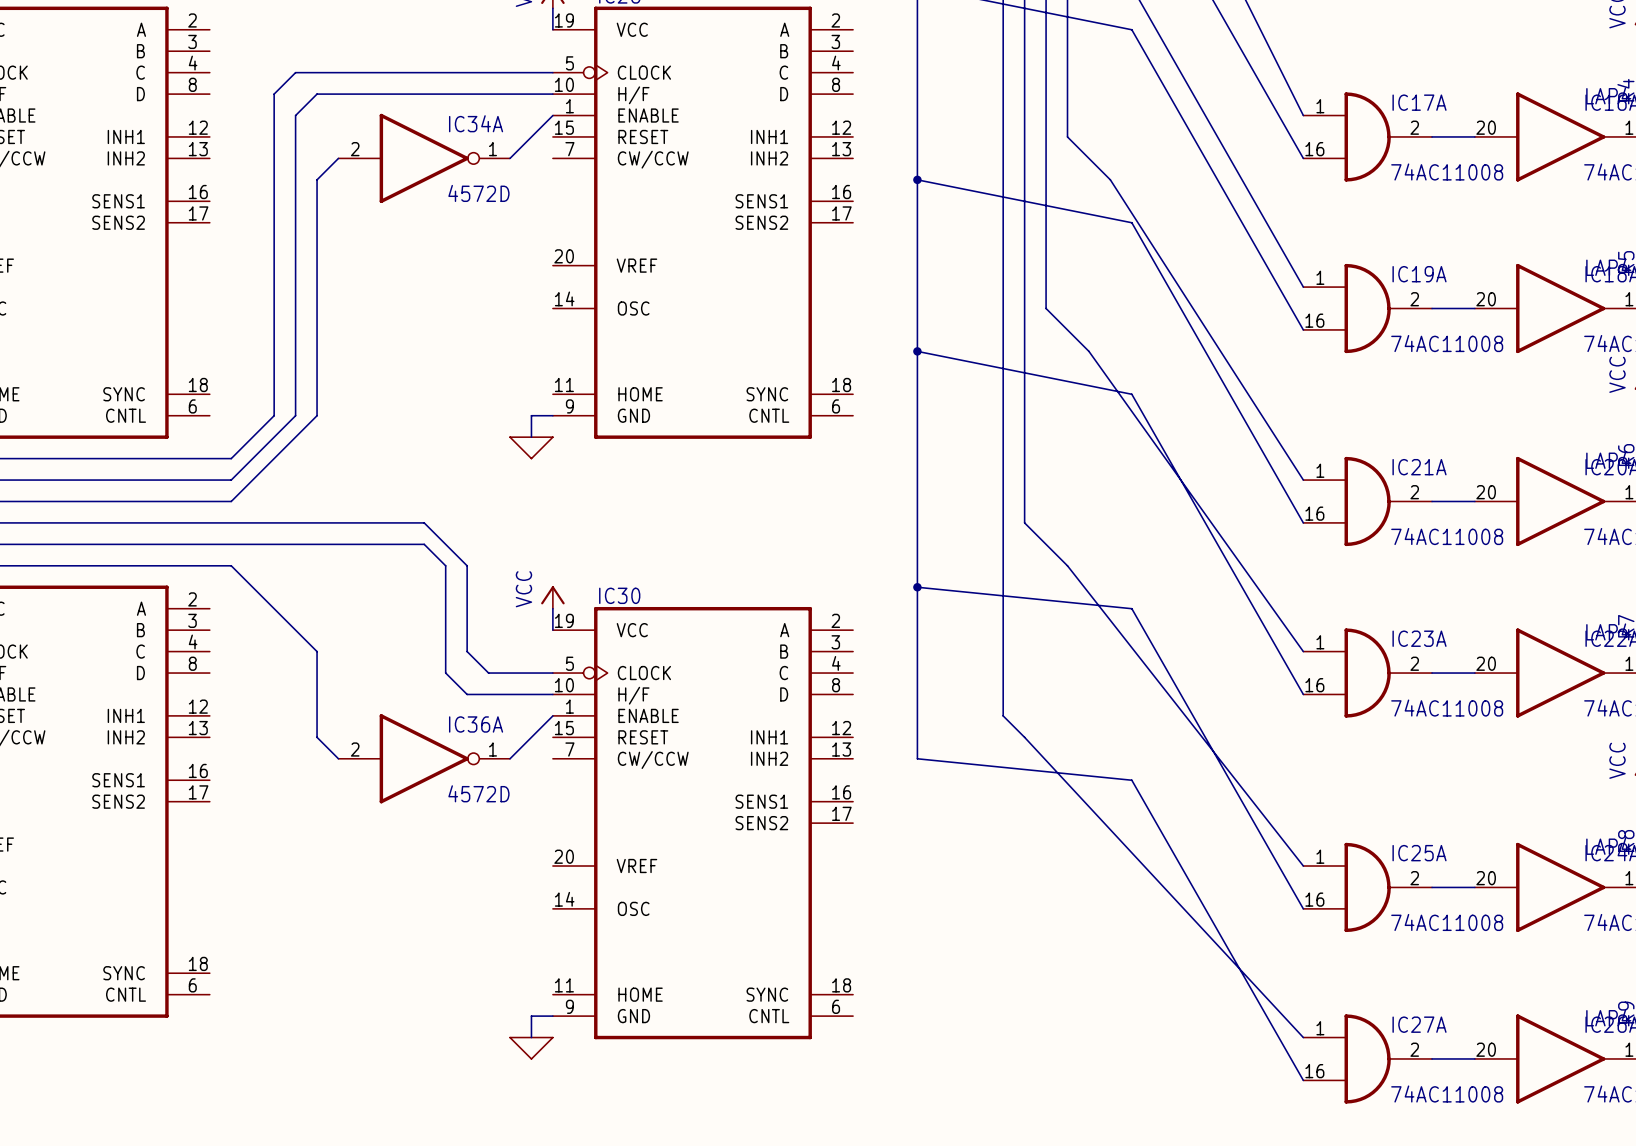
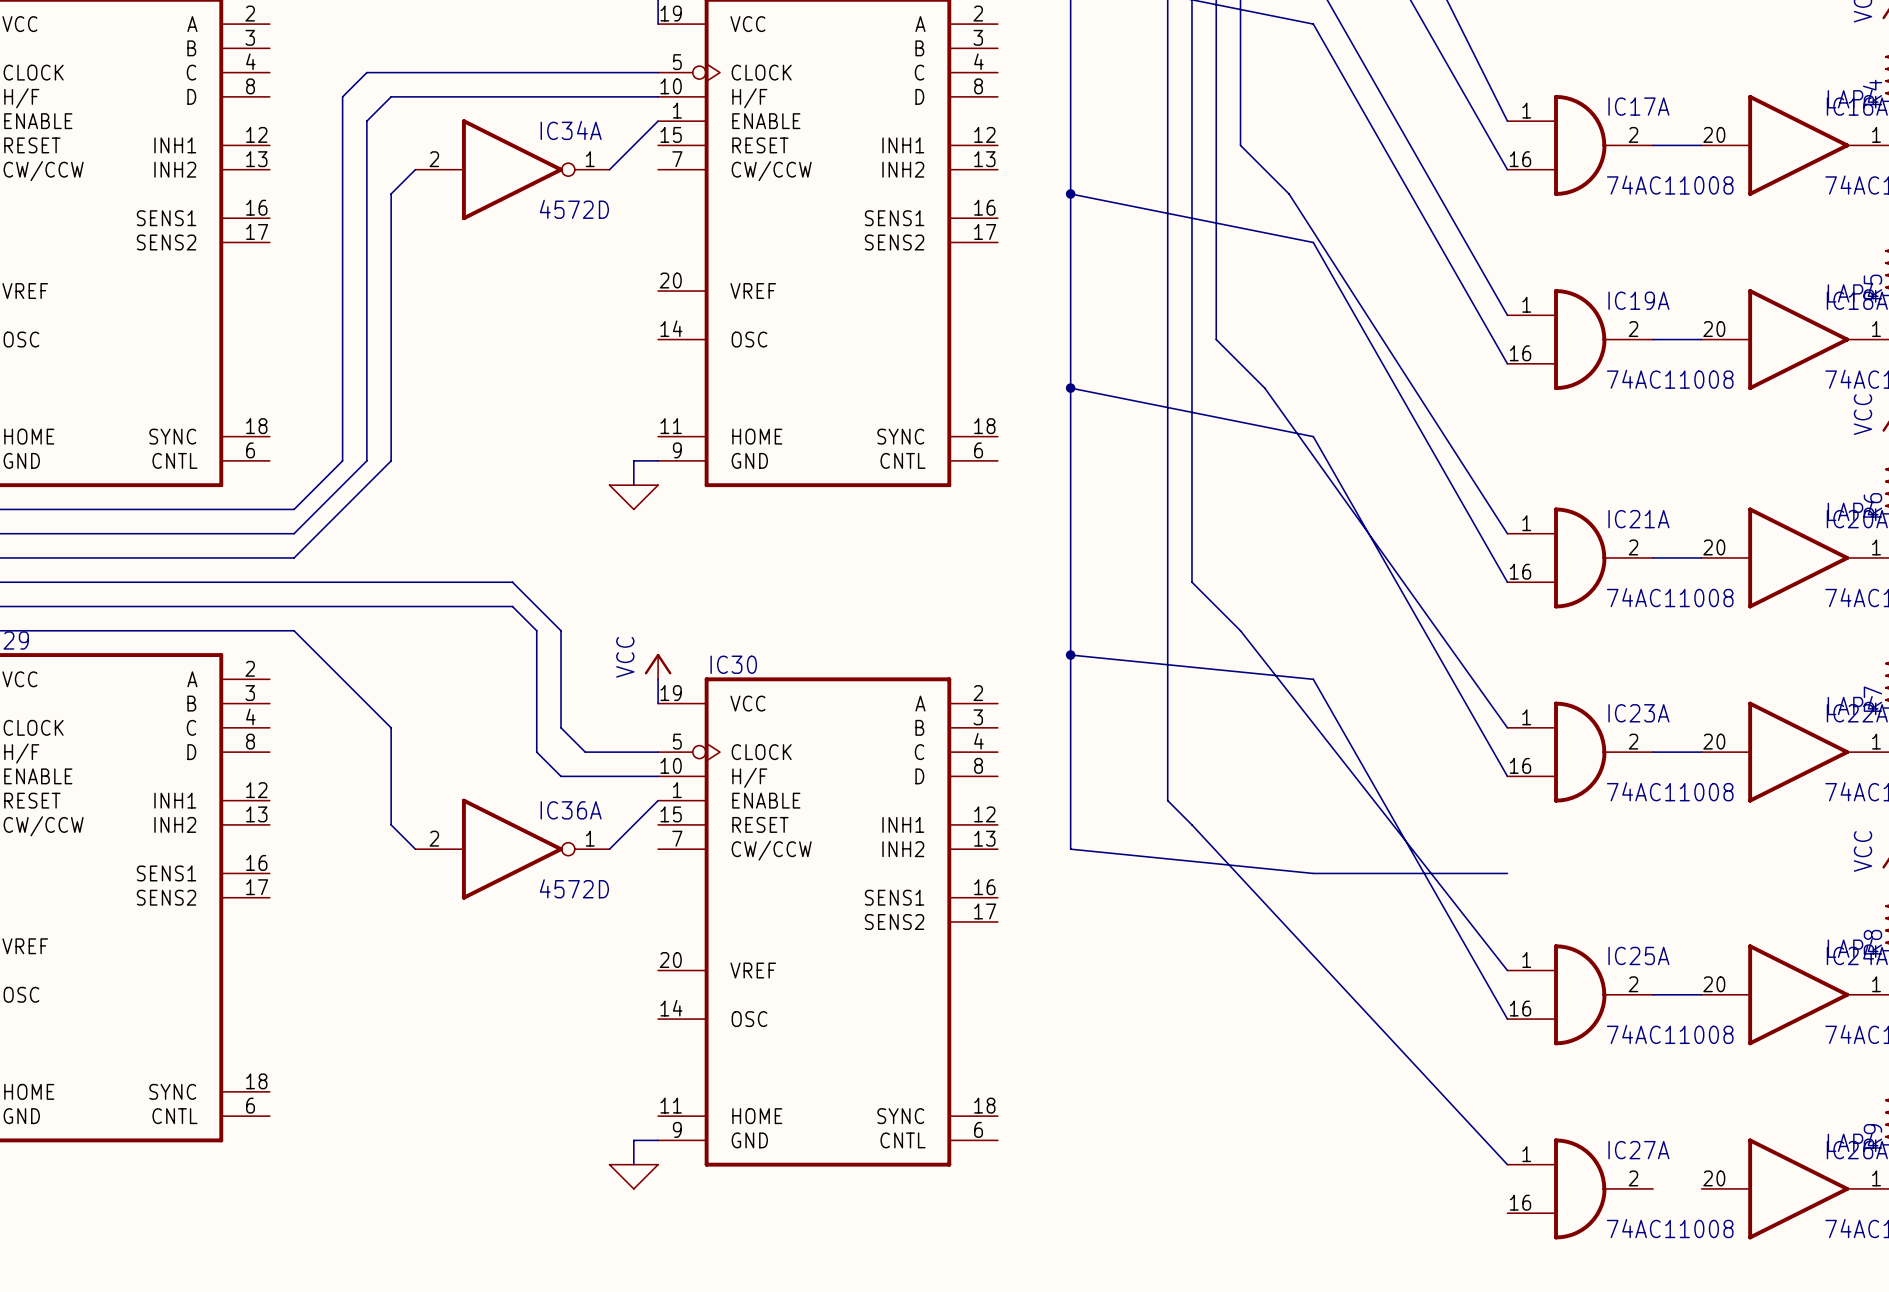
wire: (1131, 780) (1303, 1080) -> (1313, 873) (1507, 873)
wire: (1432, 1058) (1474, 1058) -> none

